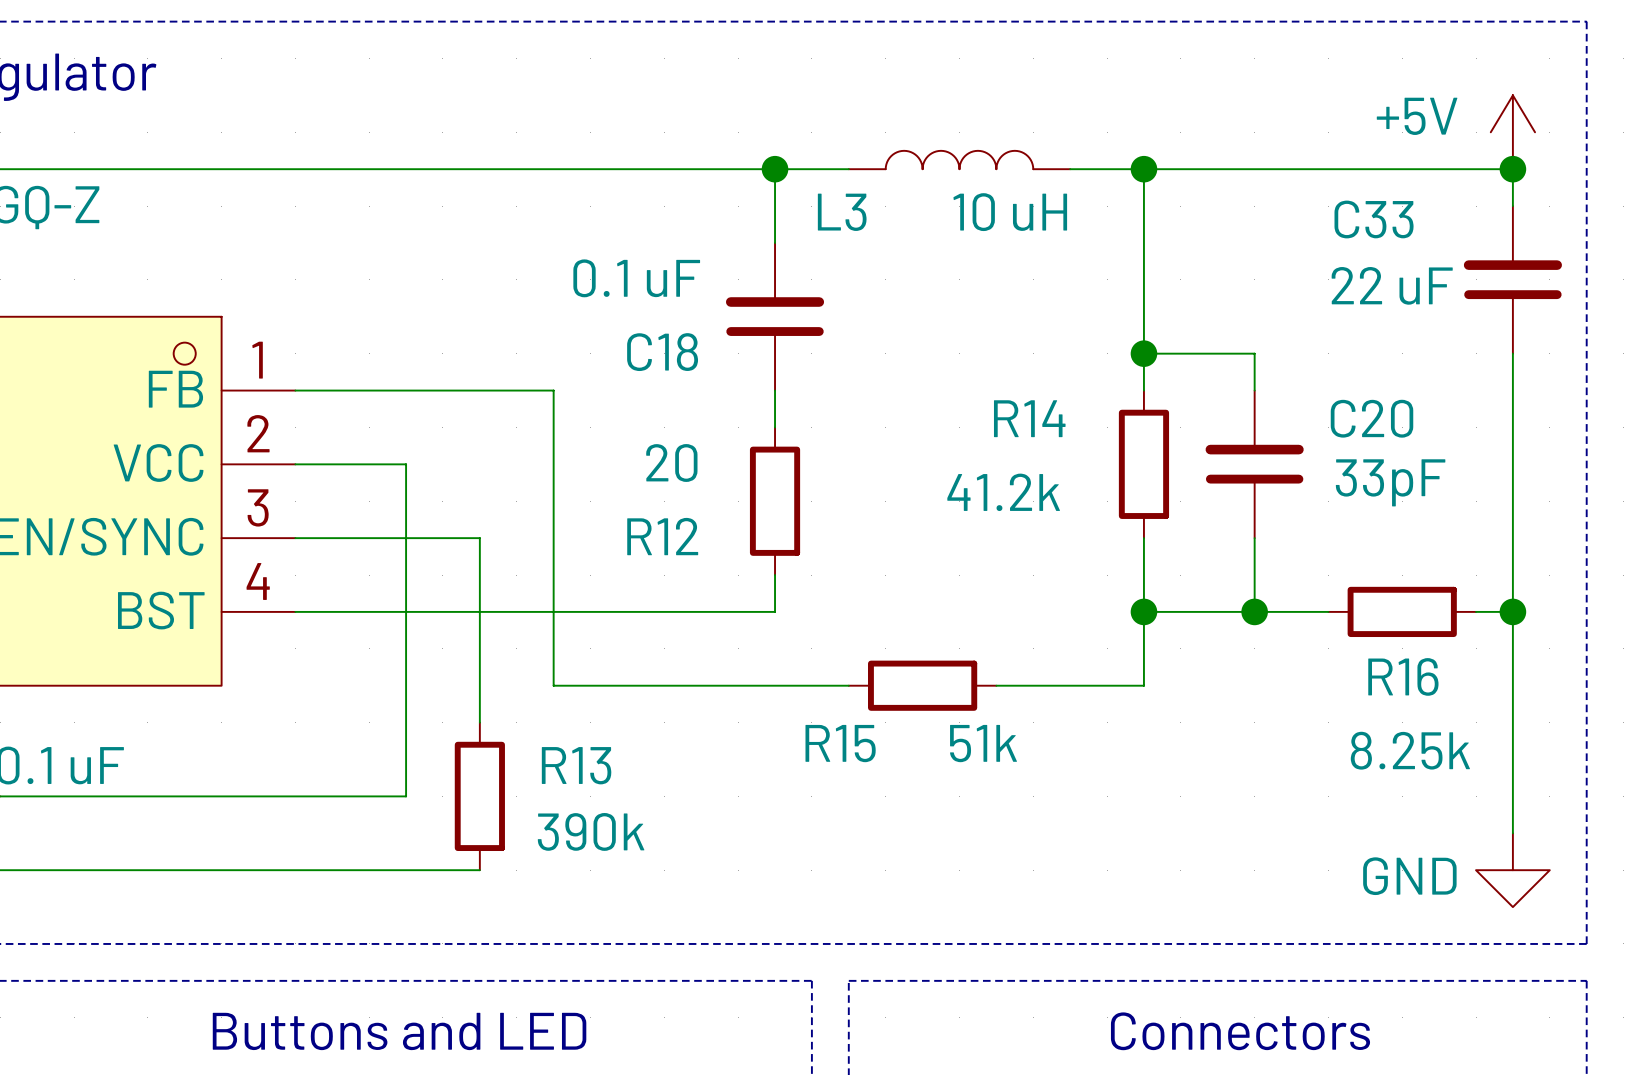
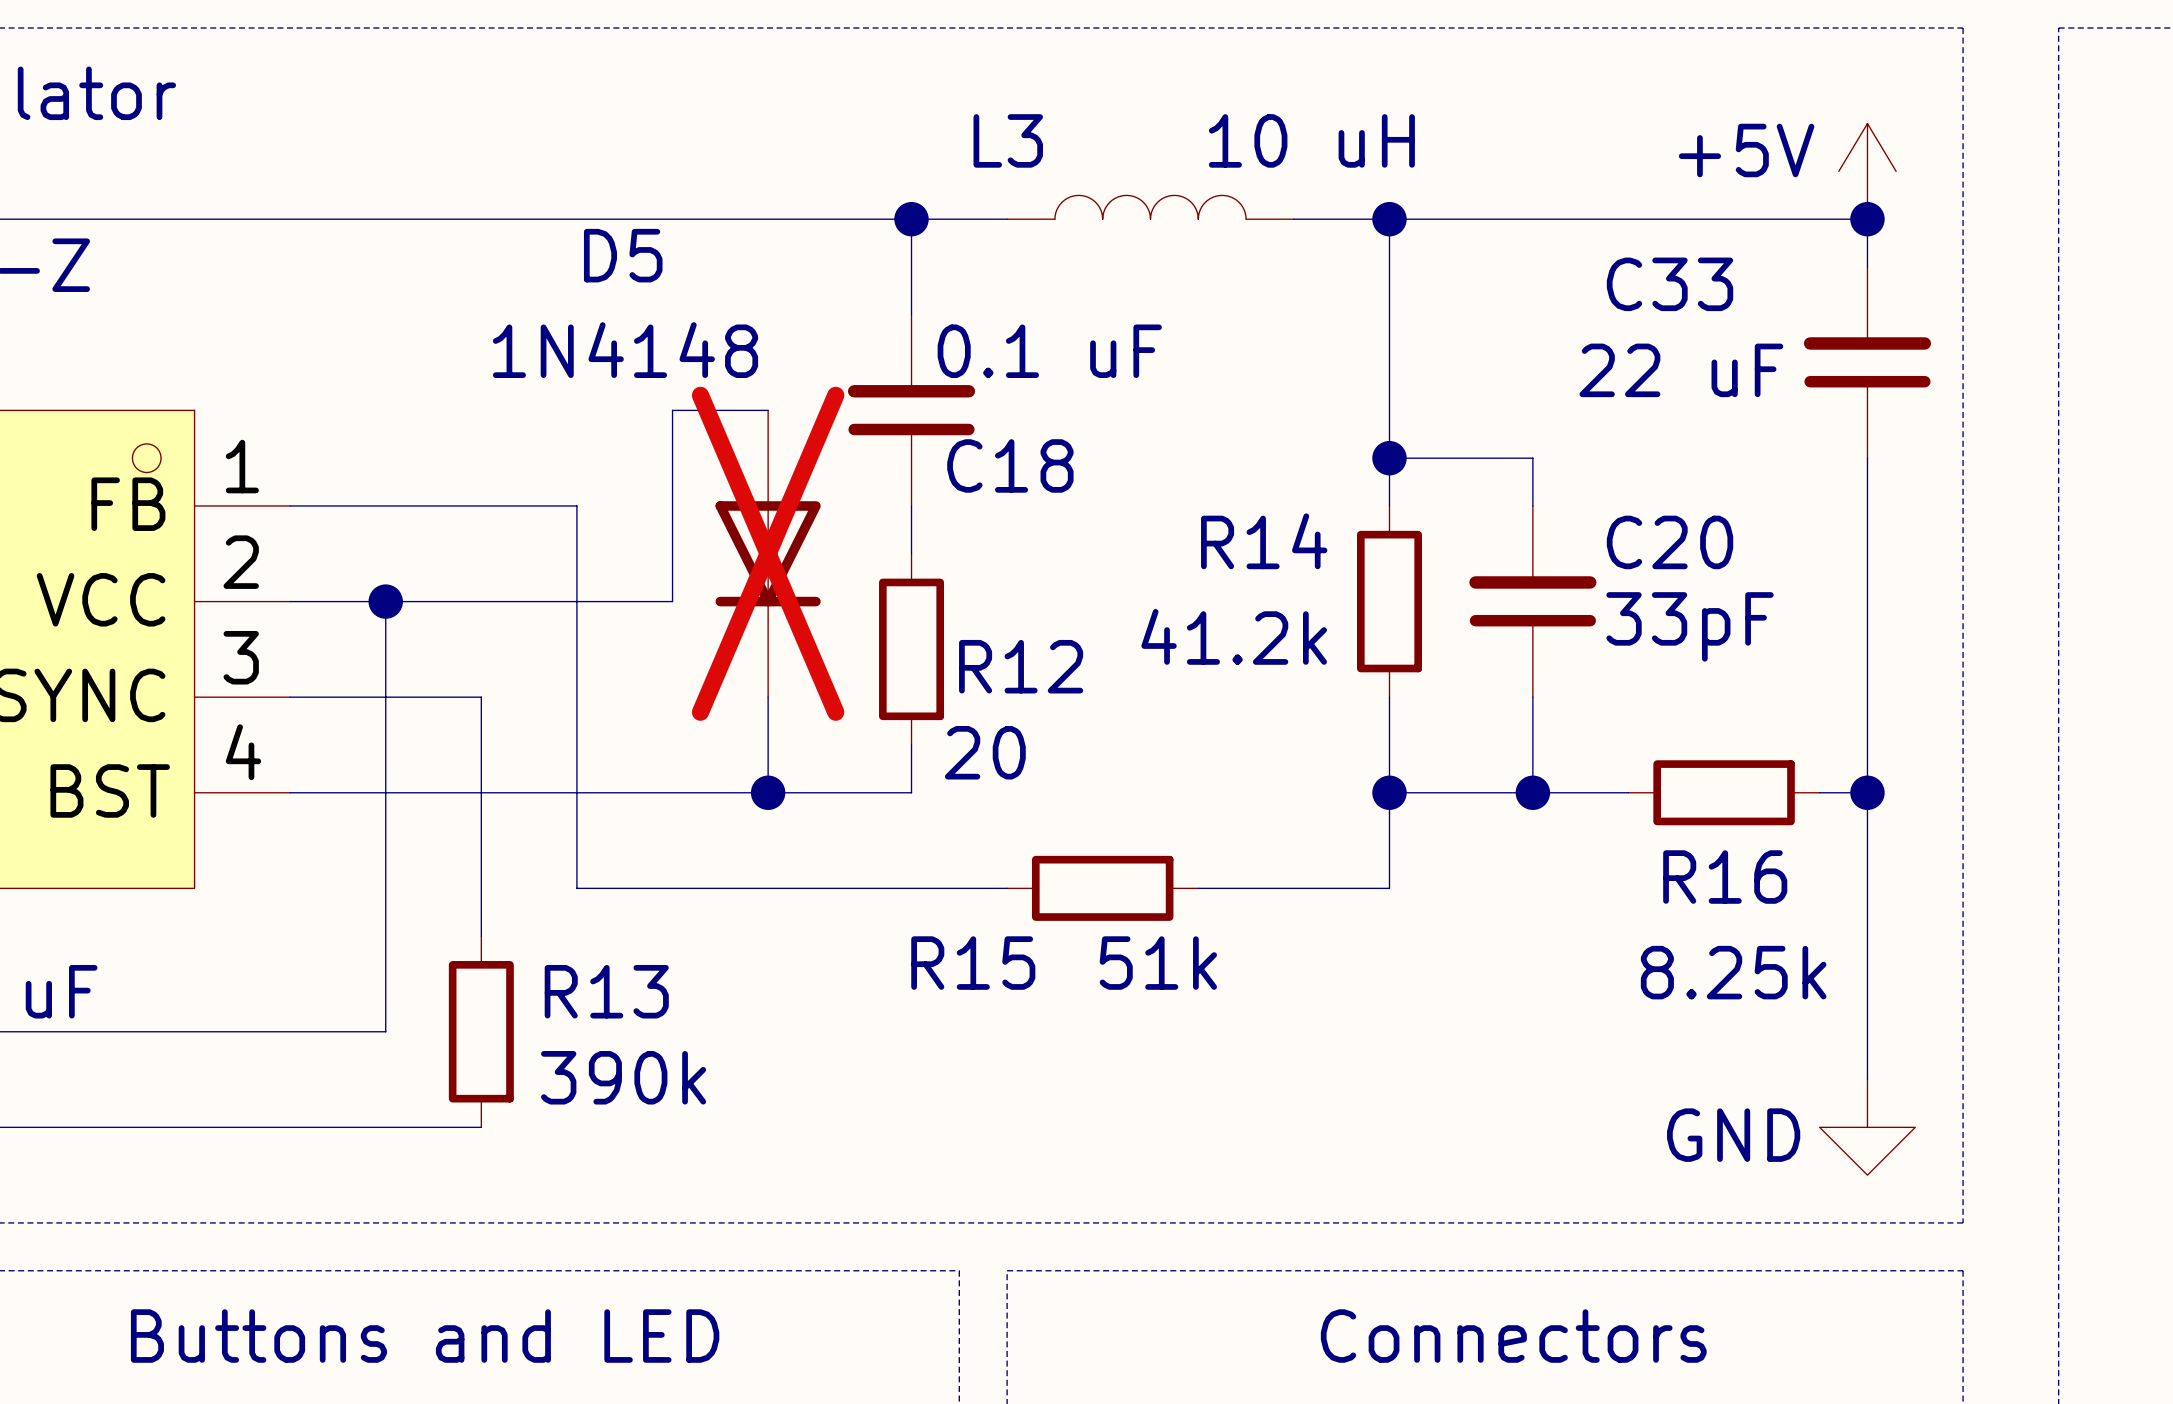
L3 name position: L3 (842, 212) -> L3 (1008, 140)
L3 value position: 10 uH (1010, 212) -> 10 uH (1311, 140)
C18 value position: 0.1 uF (636, 278) -> 0.1 uF (1049, 351)
wire: none -> (768, 410) (672, 410) (672, 601) (433, 601)
C18 name position: C18 (662, 352) -> C18 (1010, 465)
wire: (516, 390) (553, 390) (553, 685) -> (576, 505) (576, 888) (624, 888)
D5: none -> 1N4148 (768, 553)
R12 value position: 20 (671, 463) -> 20 (985, 752)
junction: none -> (385, 601)
wire: (406, 464) (406, 796) (369, 796) -> (385, 601) (385, 1031)
R12 name position: R12 (662, 536) -> R12 (1021, 666)
wire: (442, 538) (479, 538) (479, 722) -> (481, 697) (481, 936)
wire: none -> (768, 697) (768, 792)
junction: none -> (768, 792)
R13 position: (479, 796) -> (481, 1031)
wire: (442, 870) (479, 870) -> none

